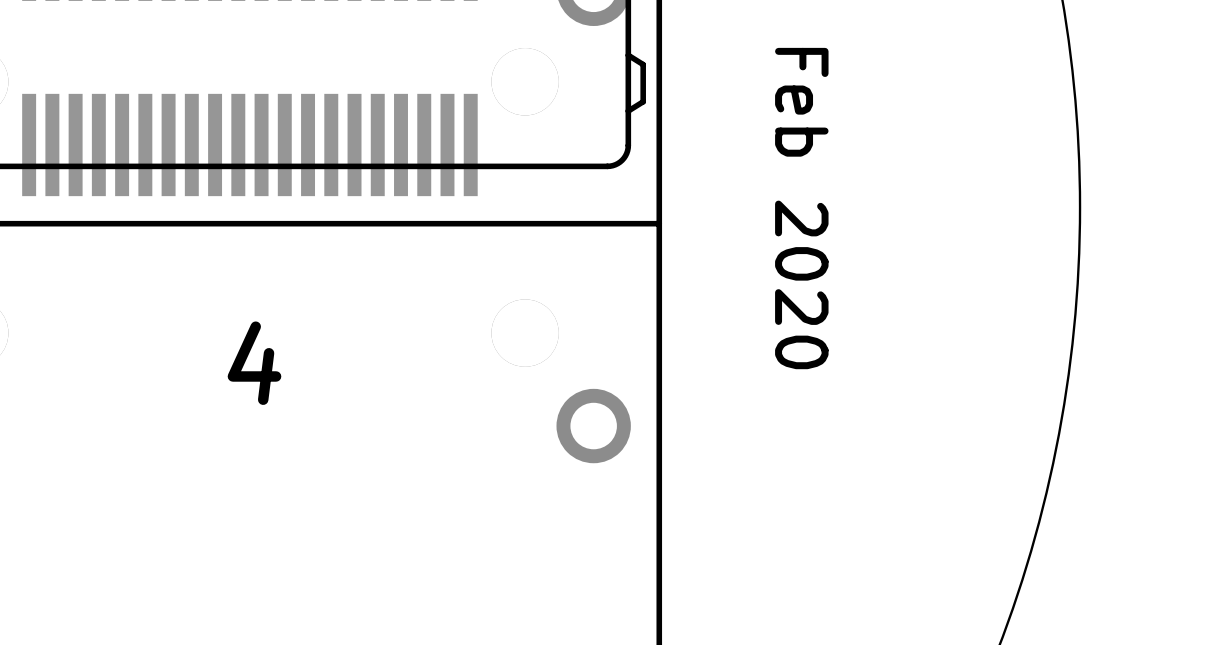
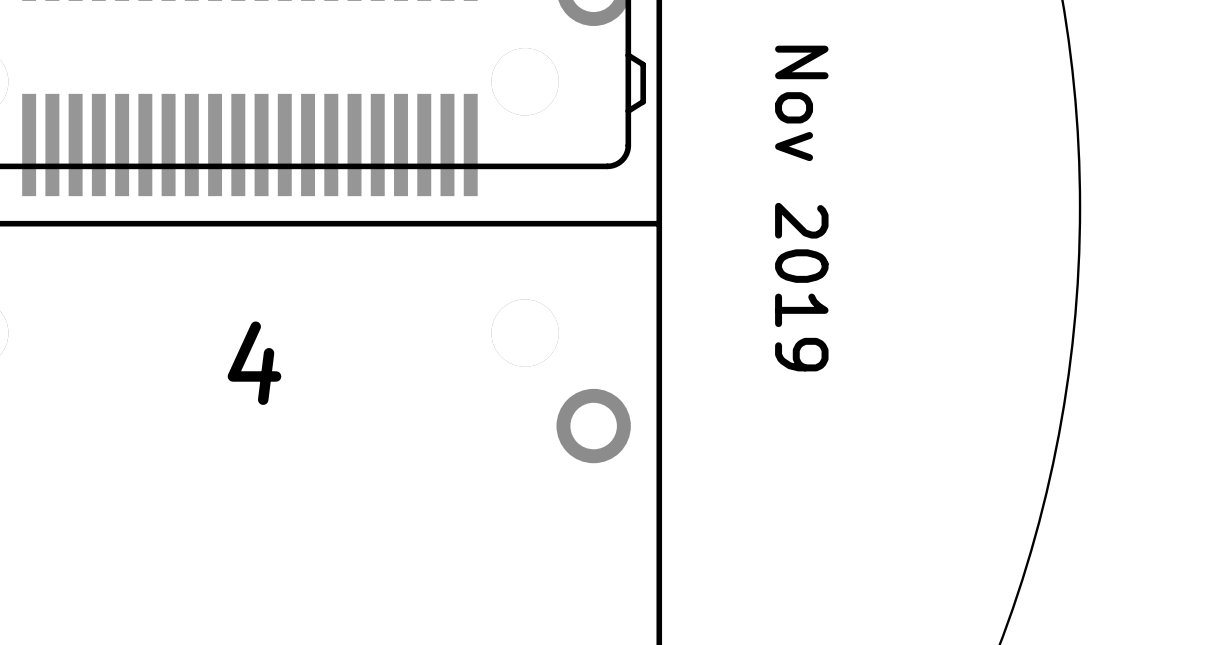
text: Feb 2020 (801, 208) -> Nov 2019 (801, 208)

